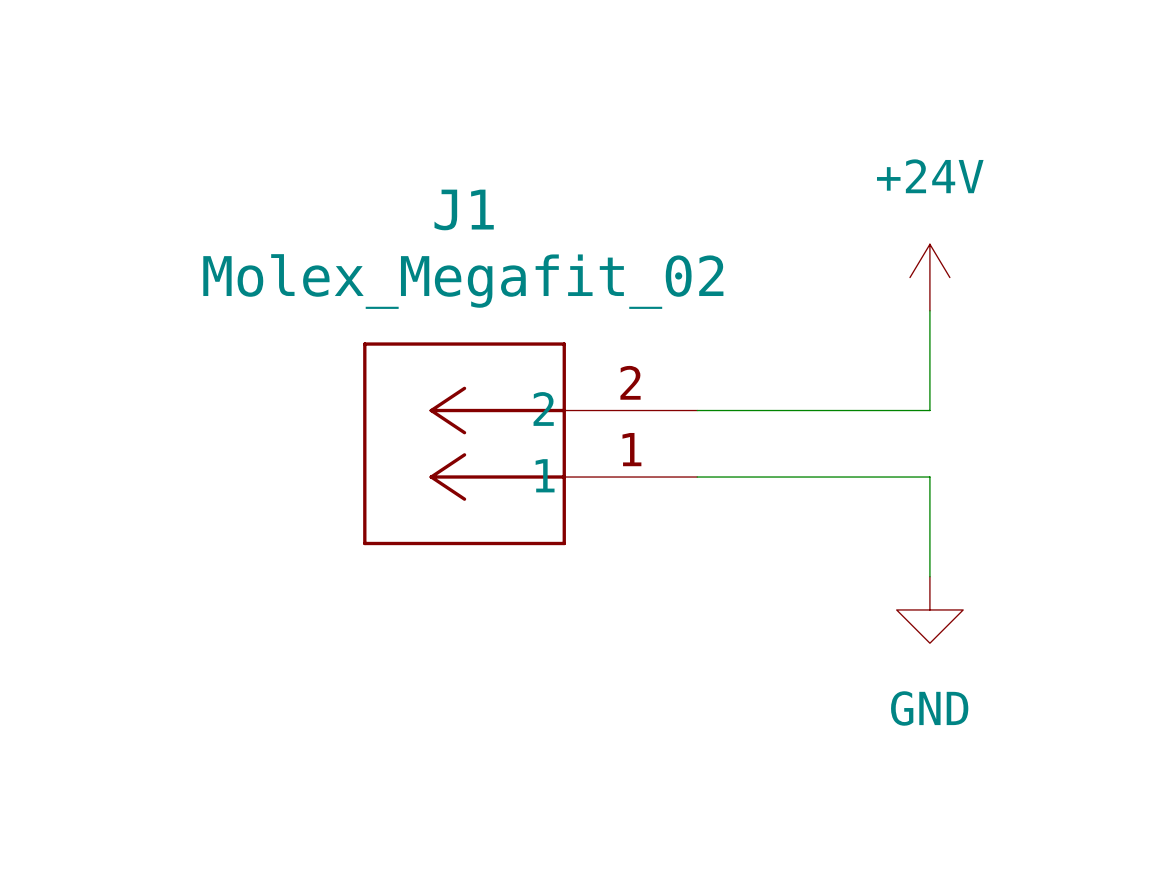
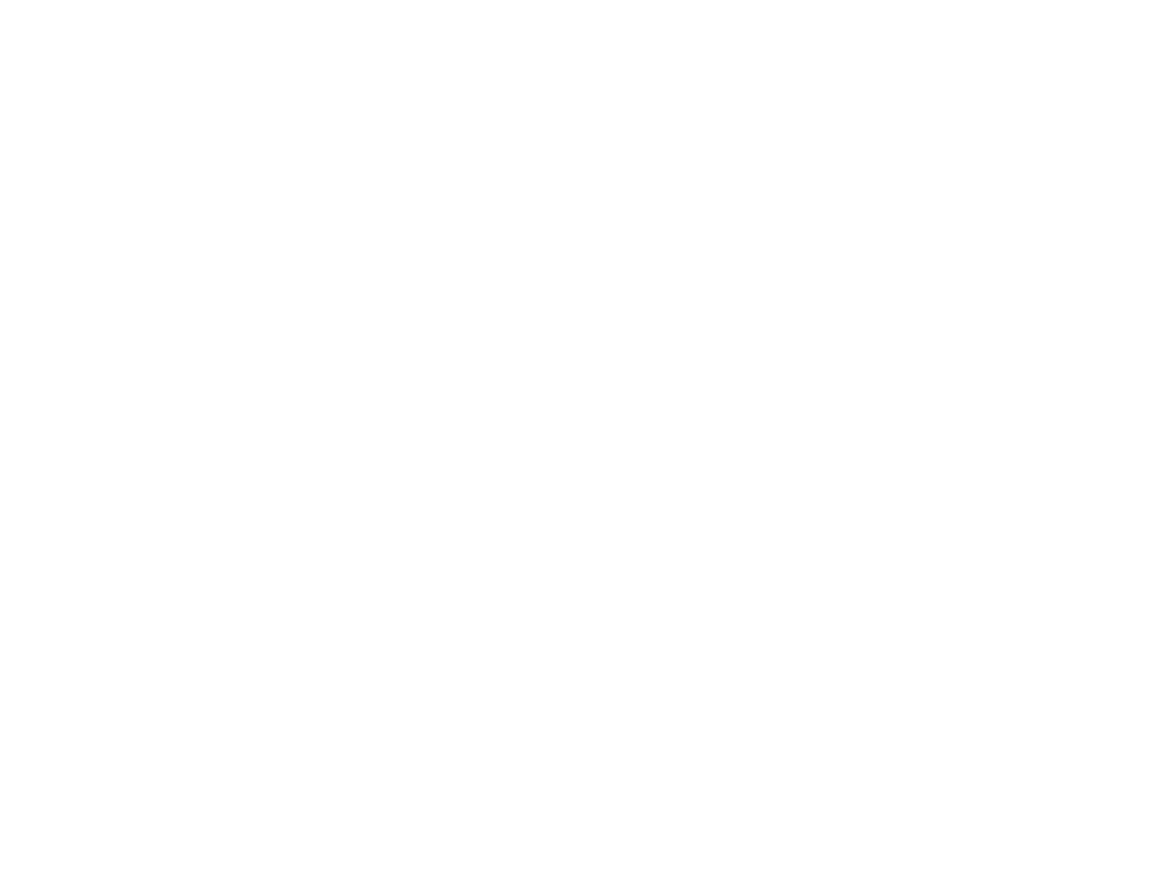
power symbol: +24V (929, 277) -> none
wire: (929, 310) (929, 410) (697, 410) -> none
J1: Molex_Megafit_02 (530, 443) -> none
wire: (697, 477) (929, 477) (929, 576) -> none
power symbol: GND (929, 609) -> none

